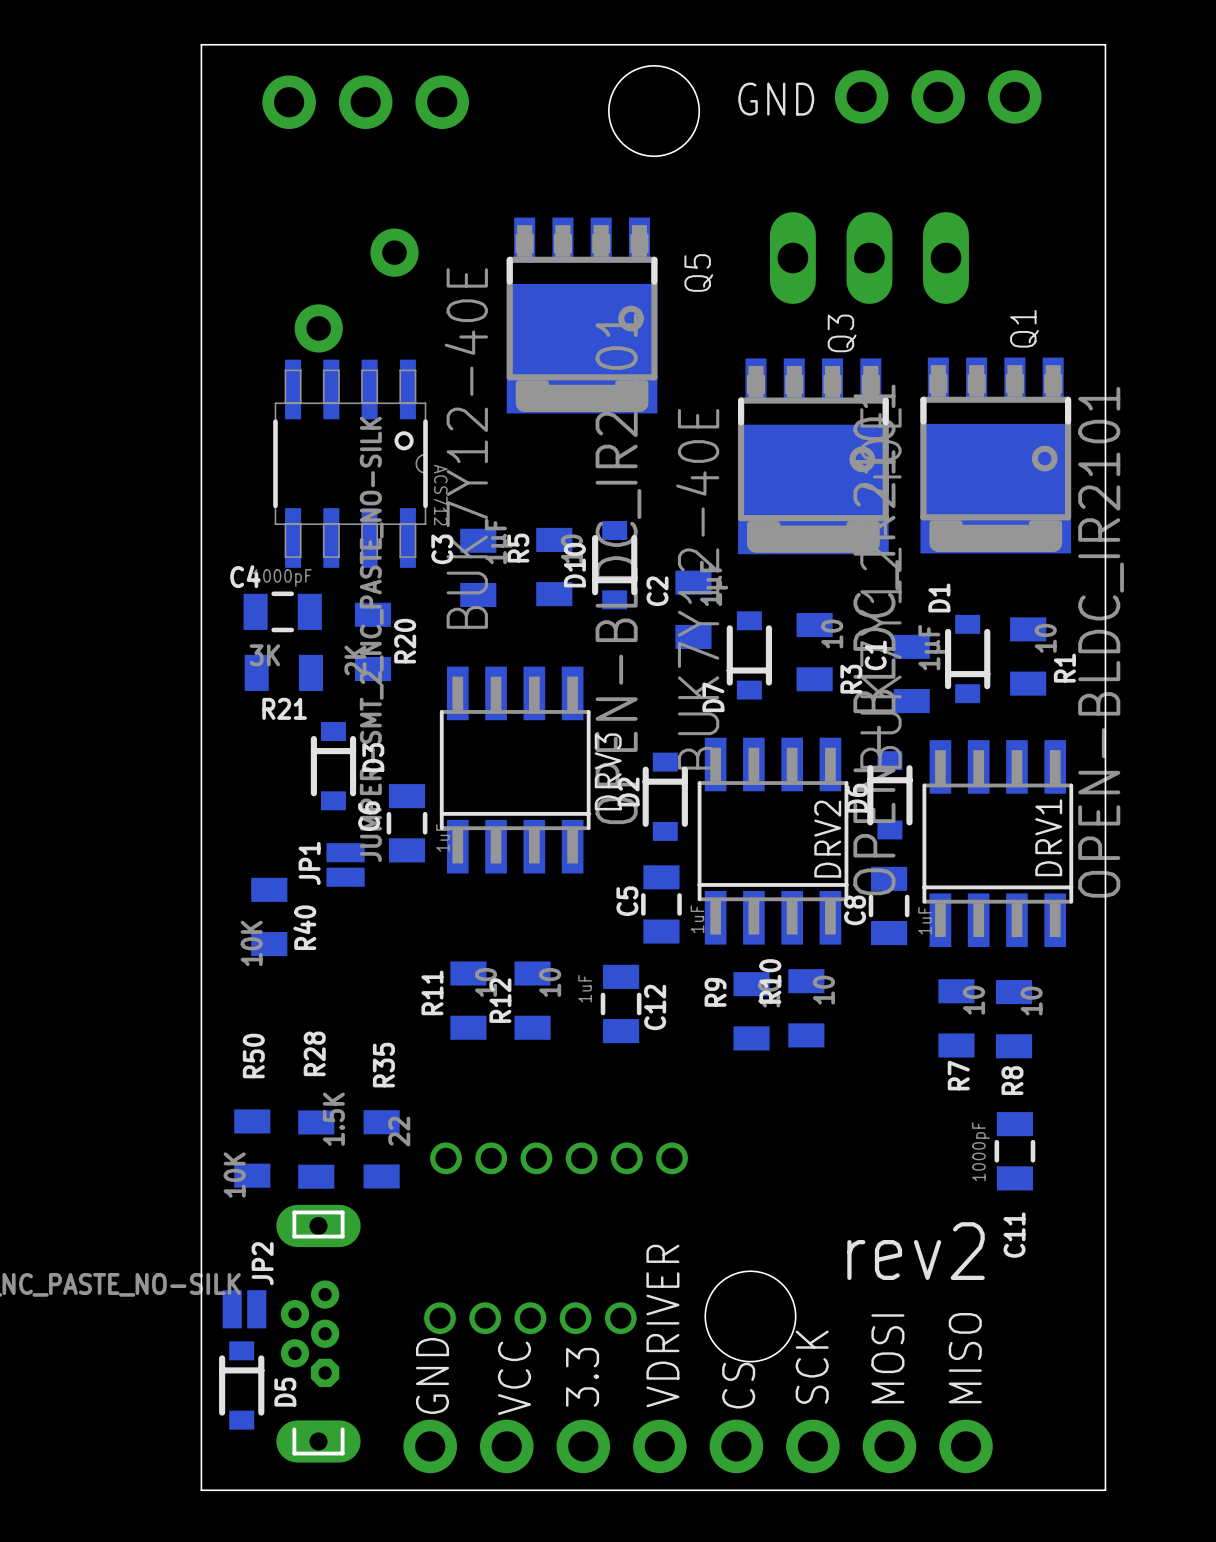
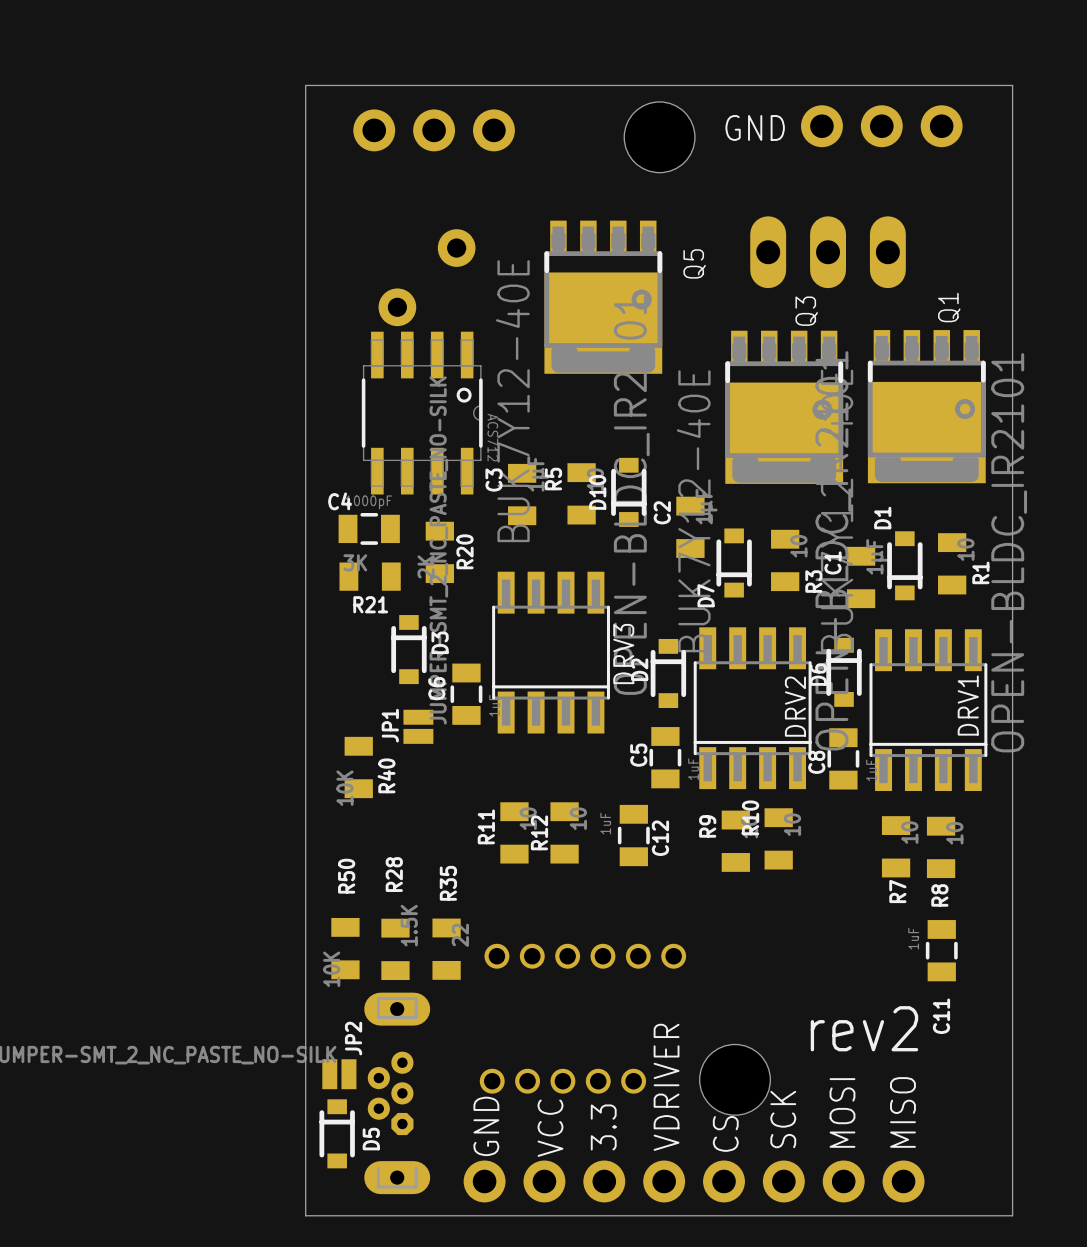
C11 value: 1000pF (980, 1151) -> 1uF (913, 938)

